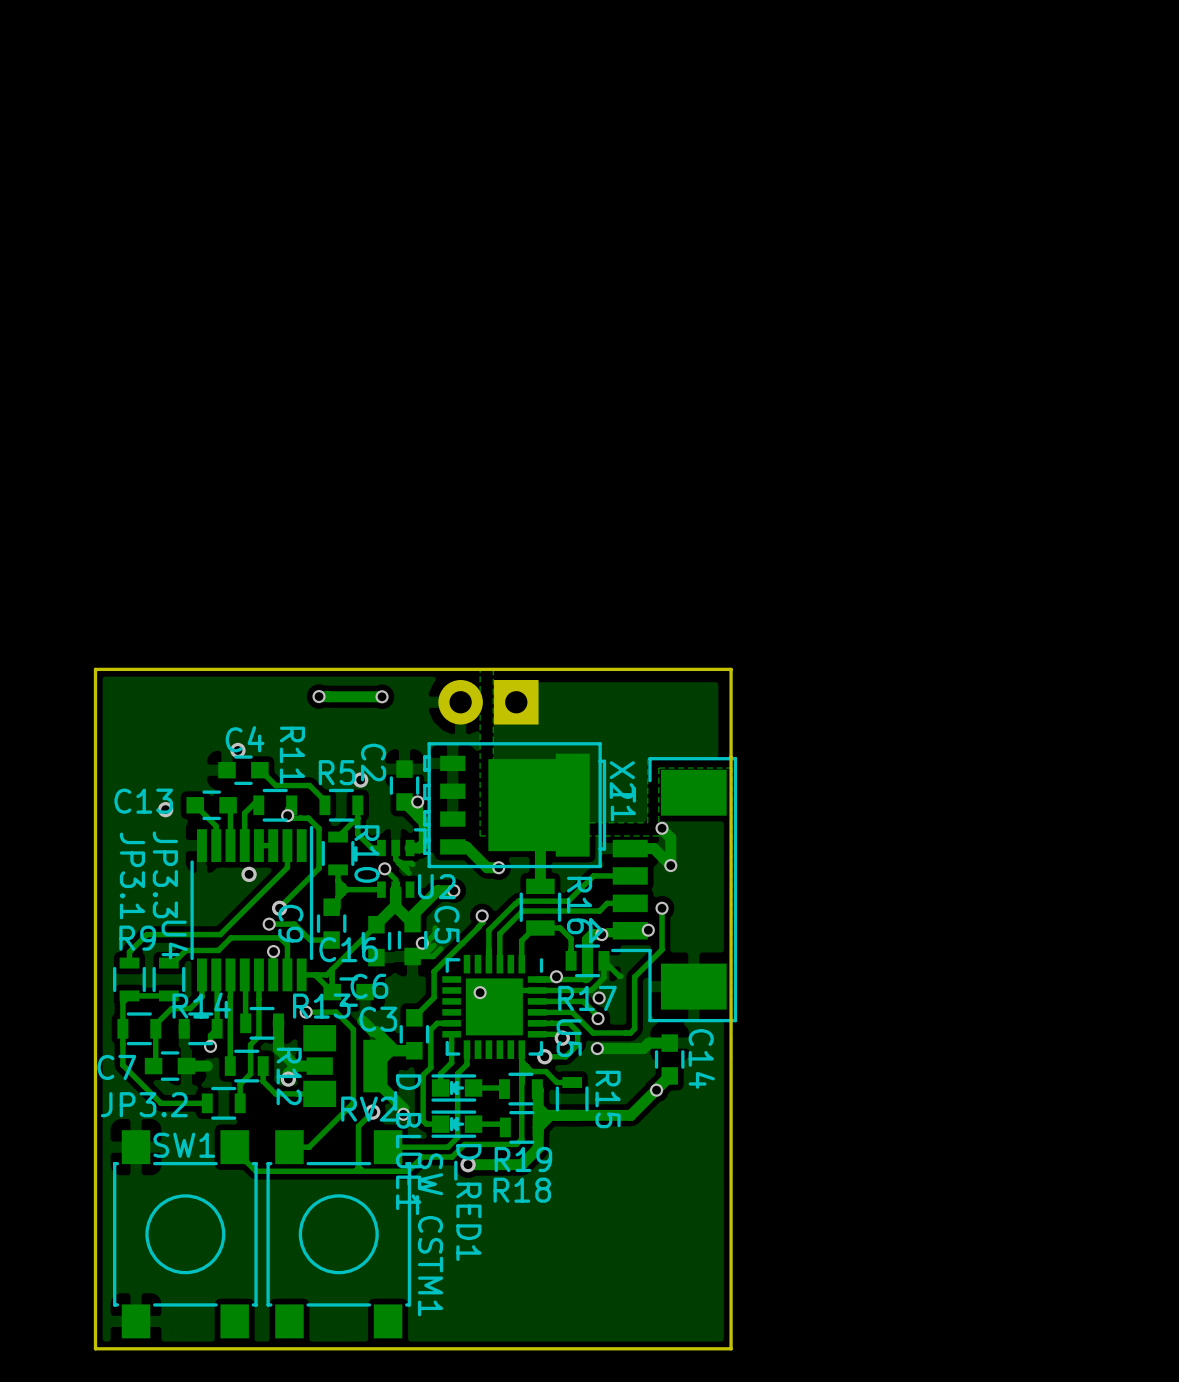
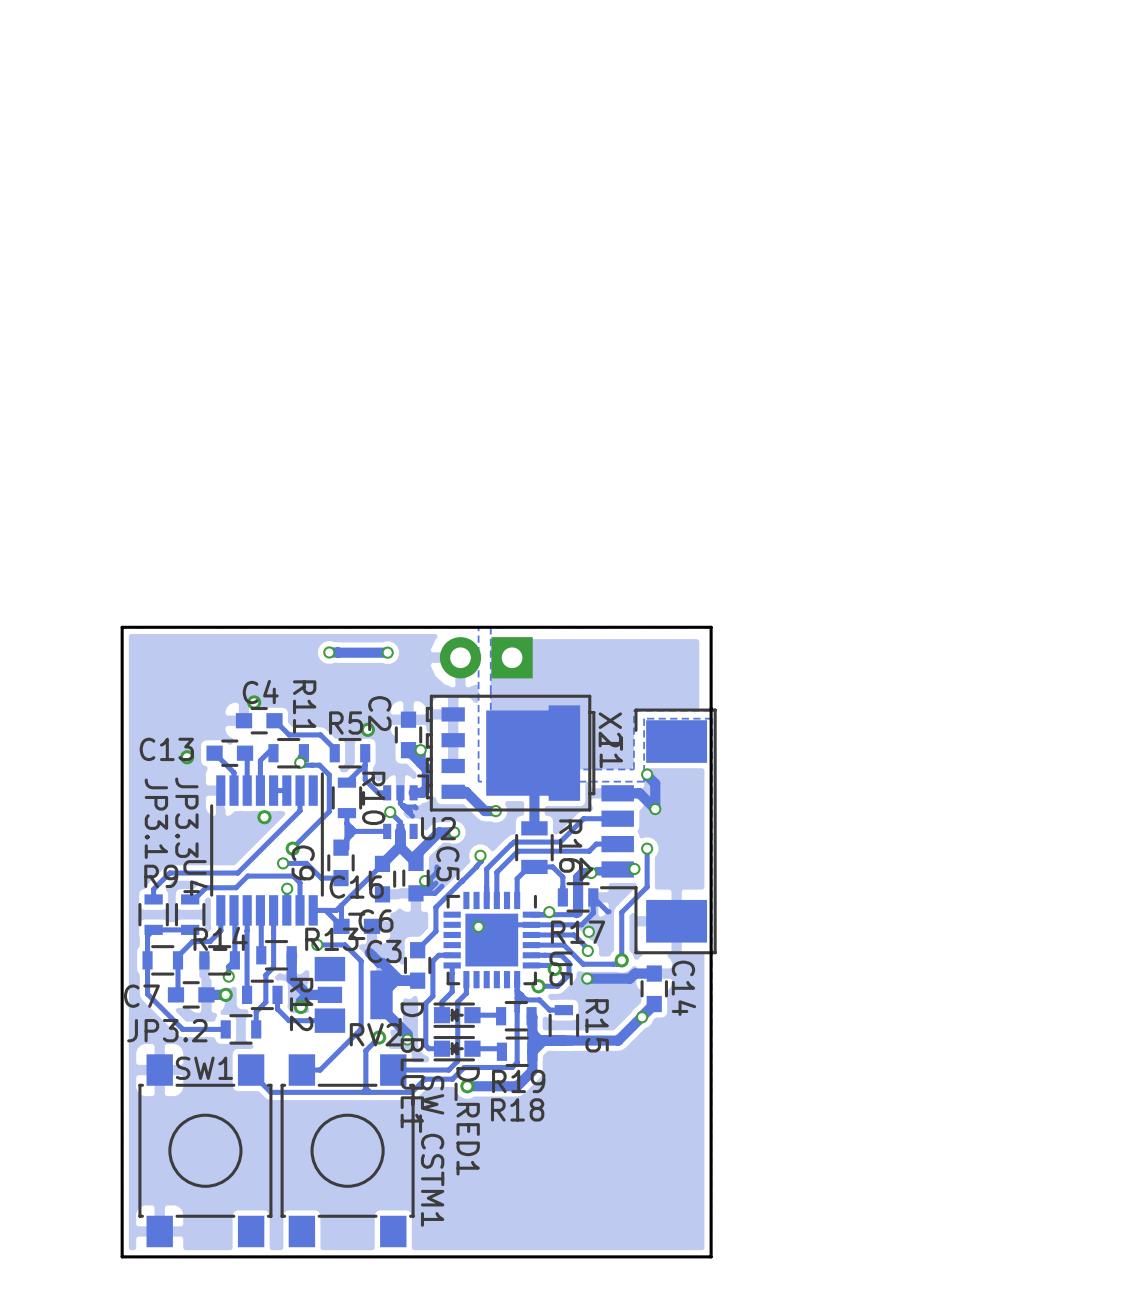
via: none -> (621, 960)
via: none -> (225, 994)

